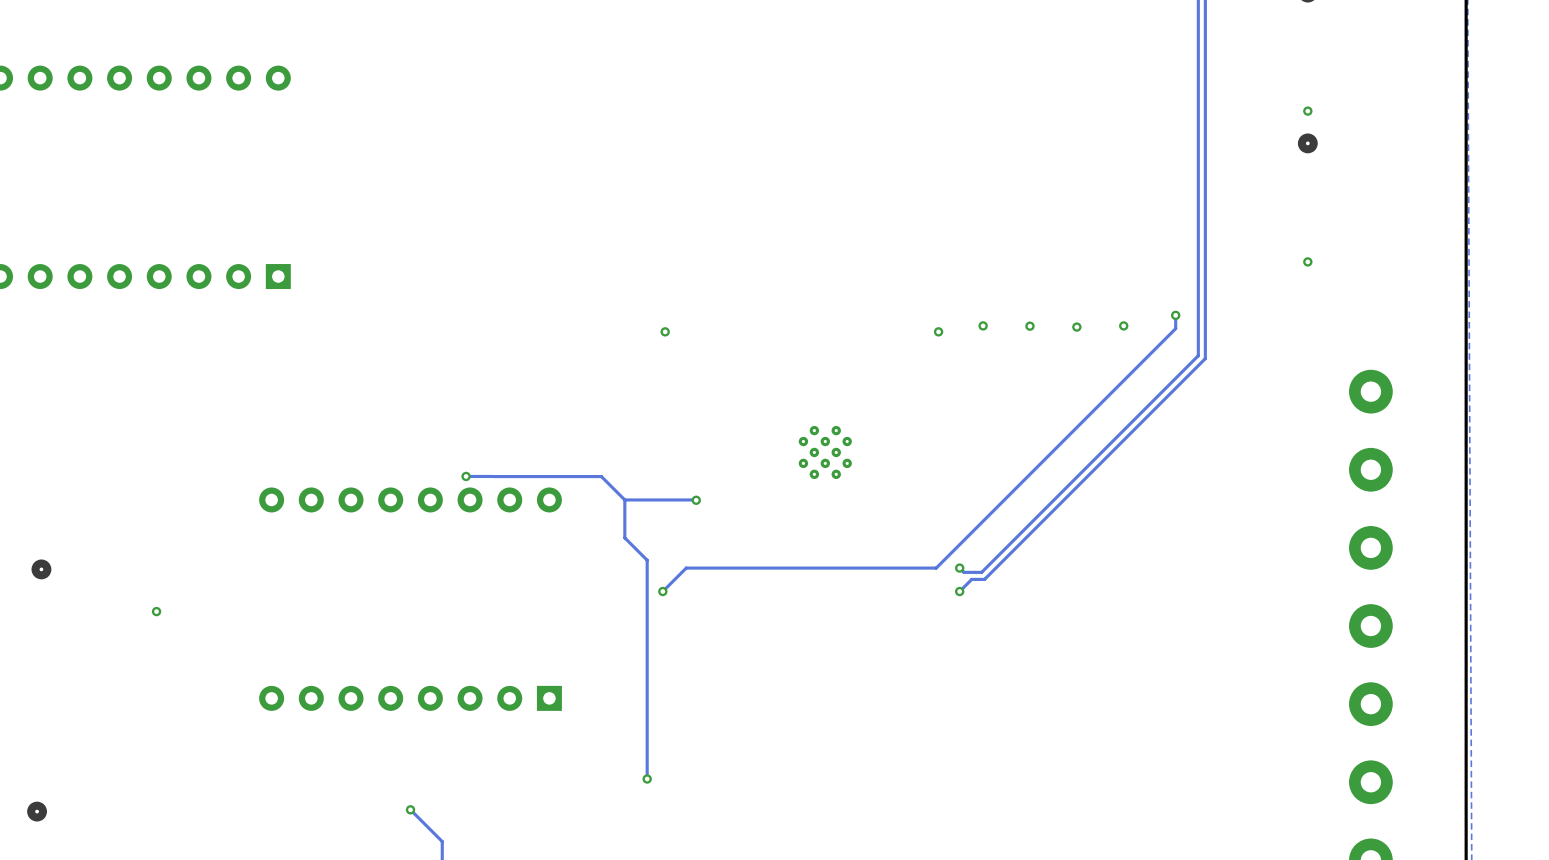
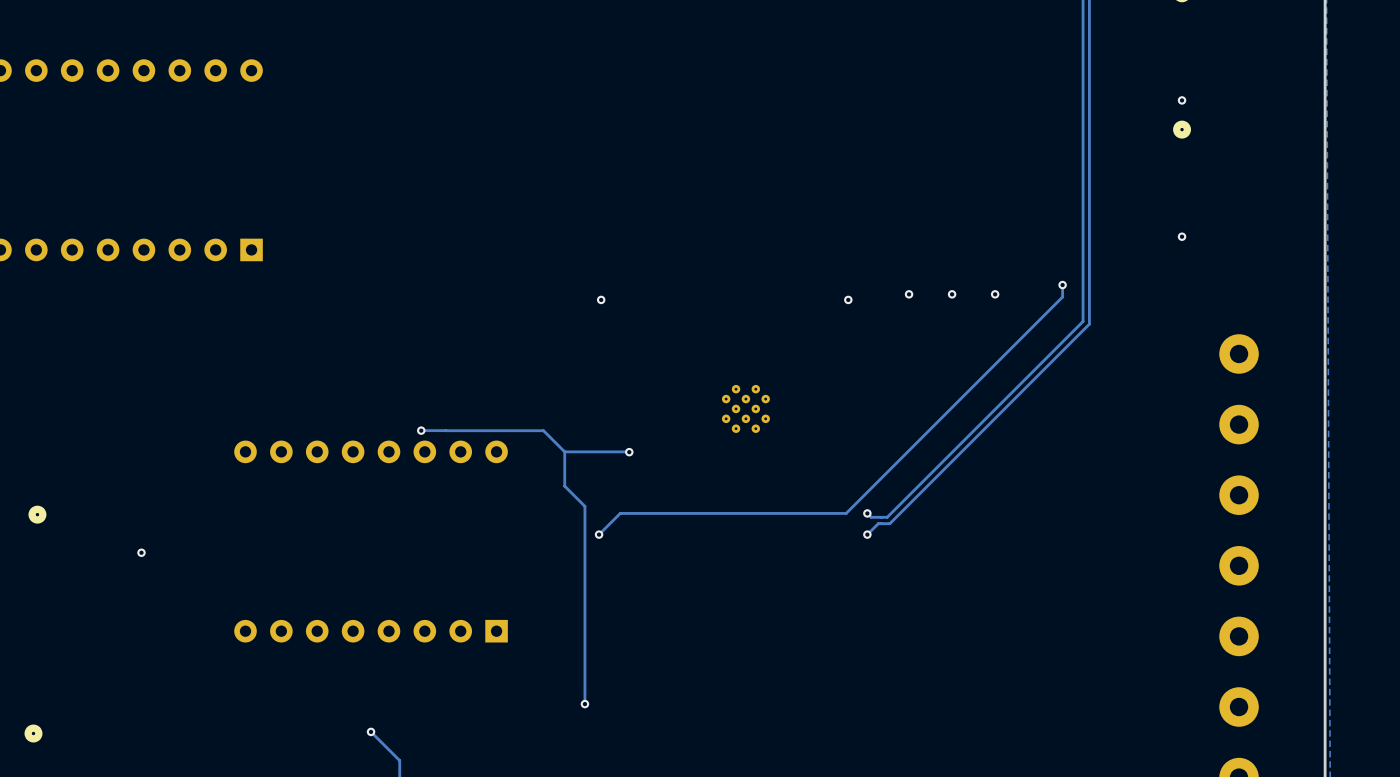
via: (983, 325) -> none
via: none -> (909, 294)
via: none -> (952, 294)
via: none -> (995, 294)
via: (1123, 325) -> none
via: (1029, 326) -> none
via: (1076, 327) -> none

